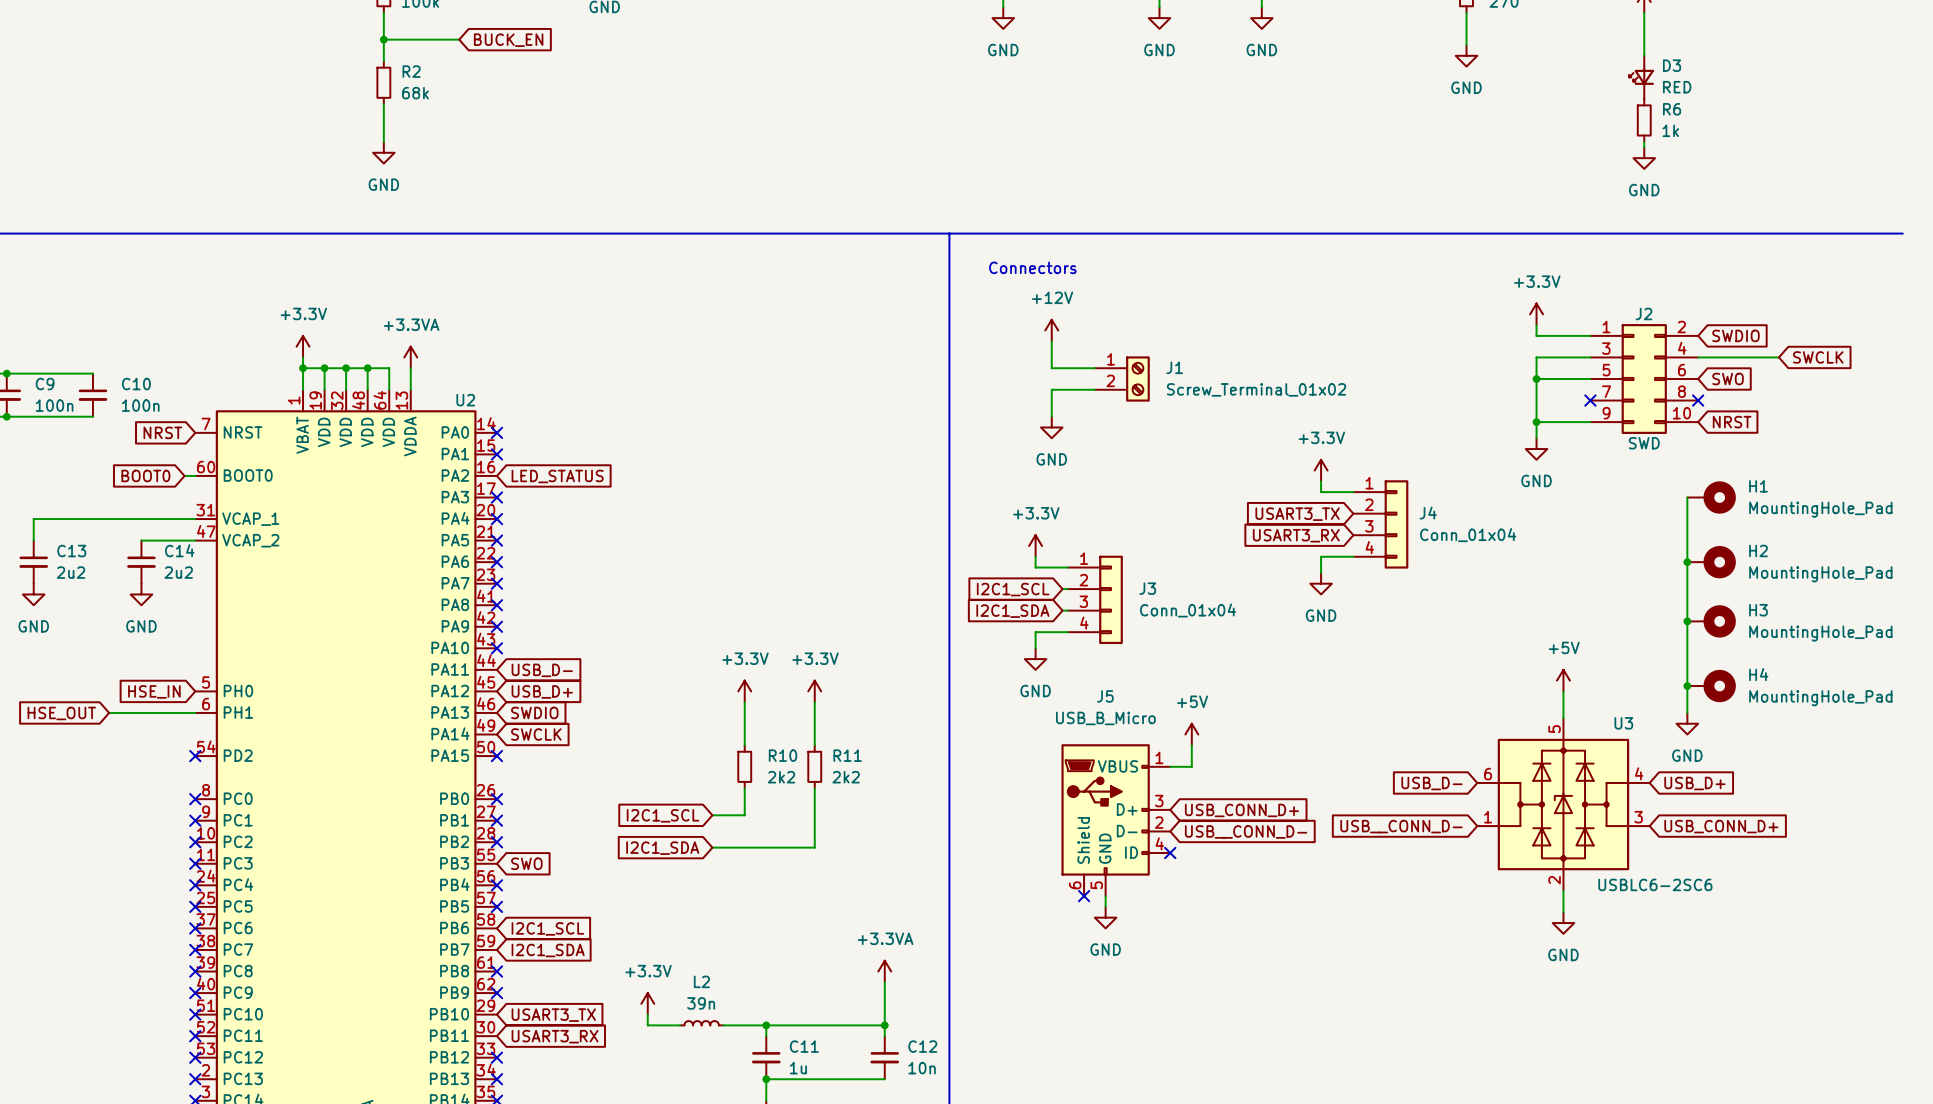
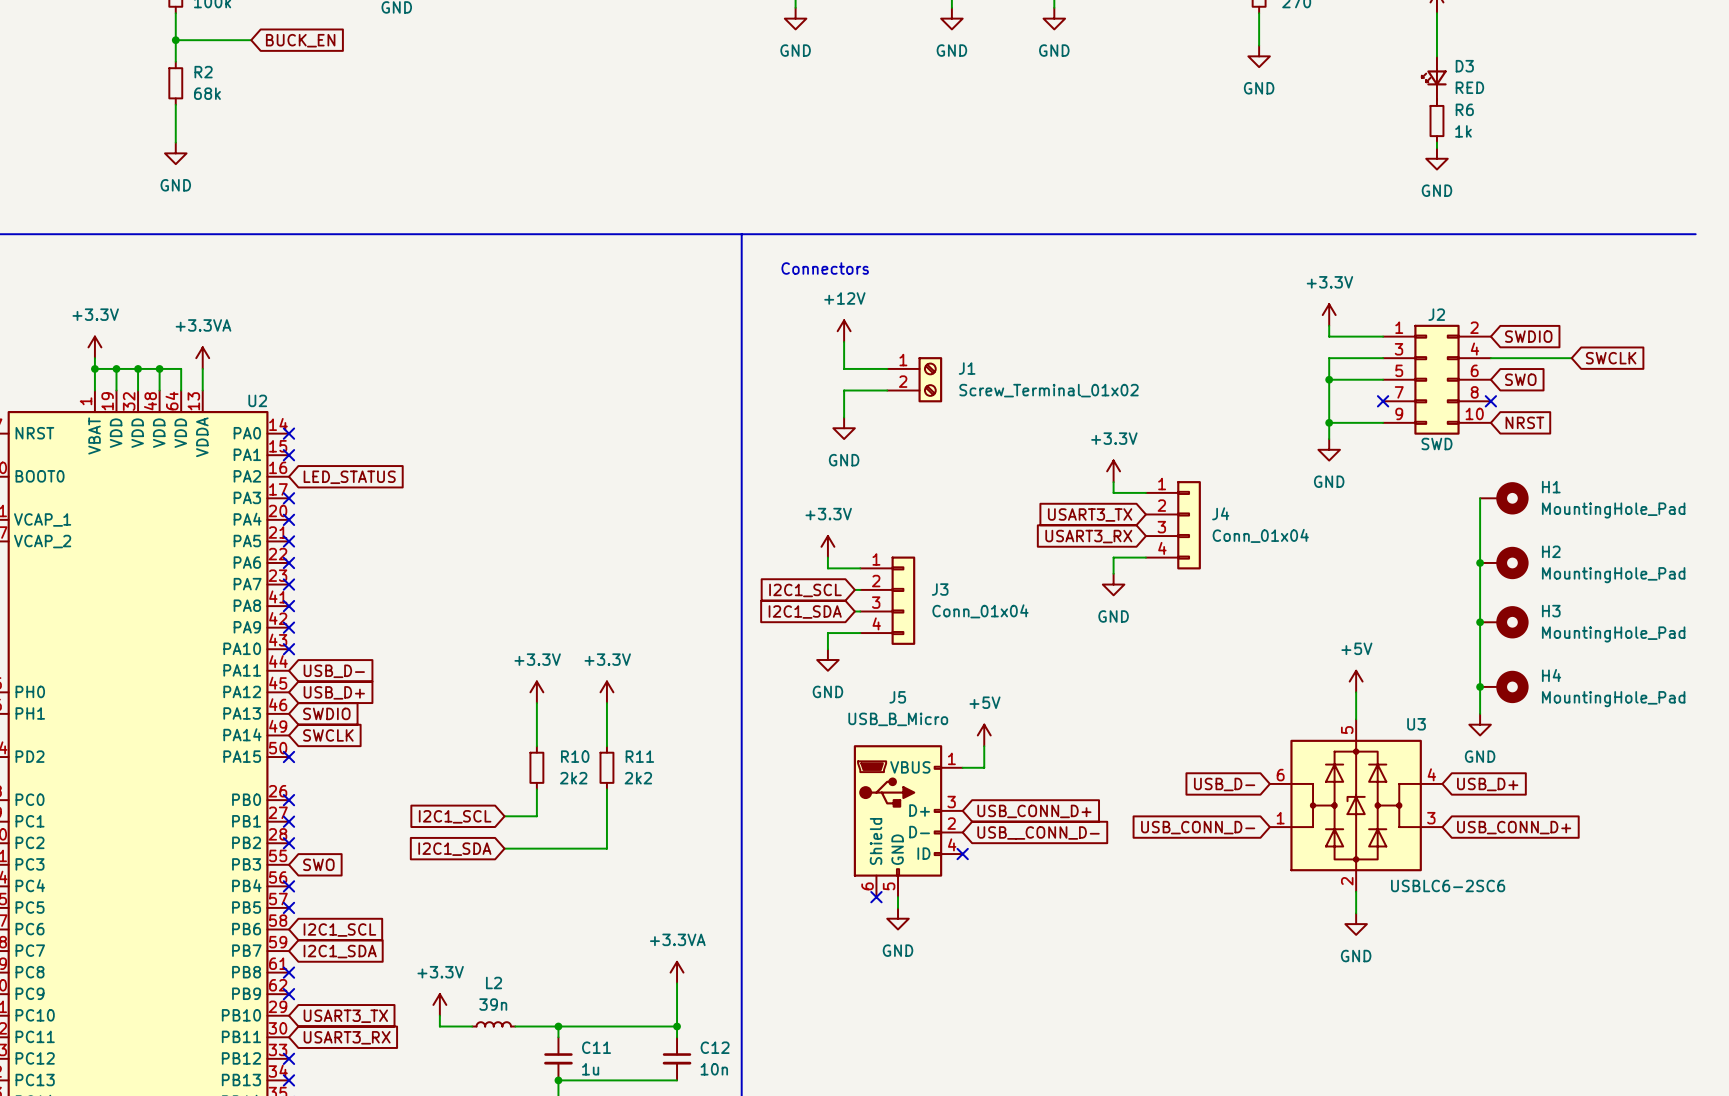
global label: USB__CONN_D- (1401, 826) -> USB_CONN_D- (1198, 827)

